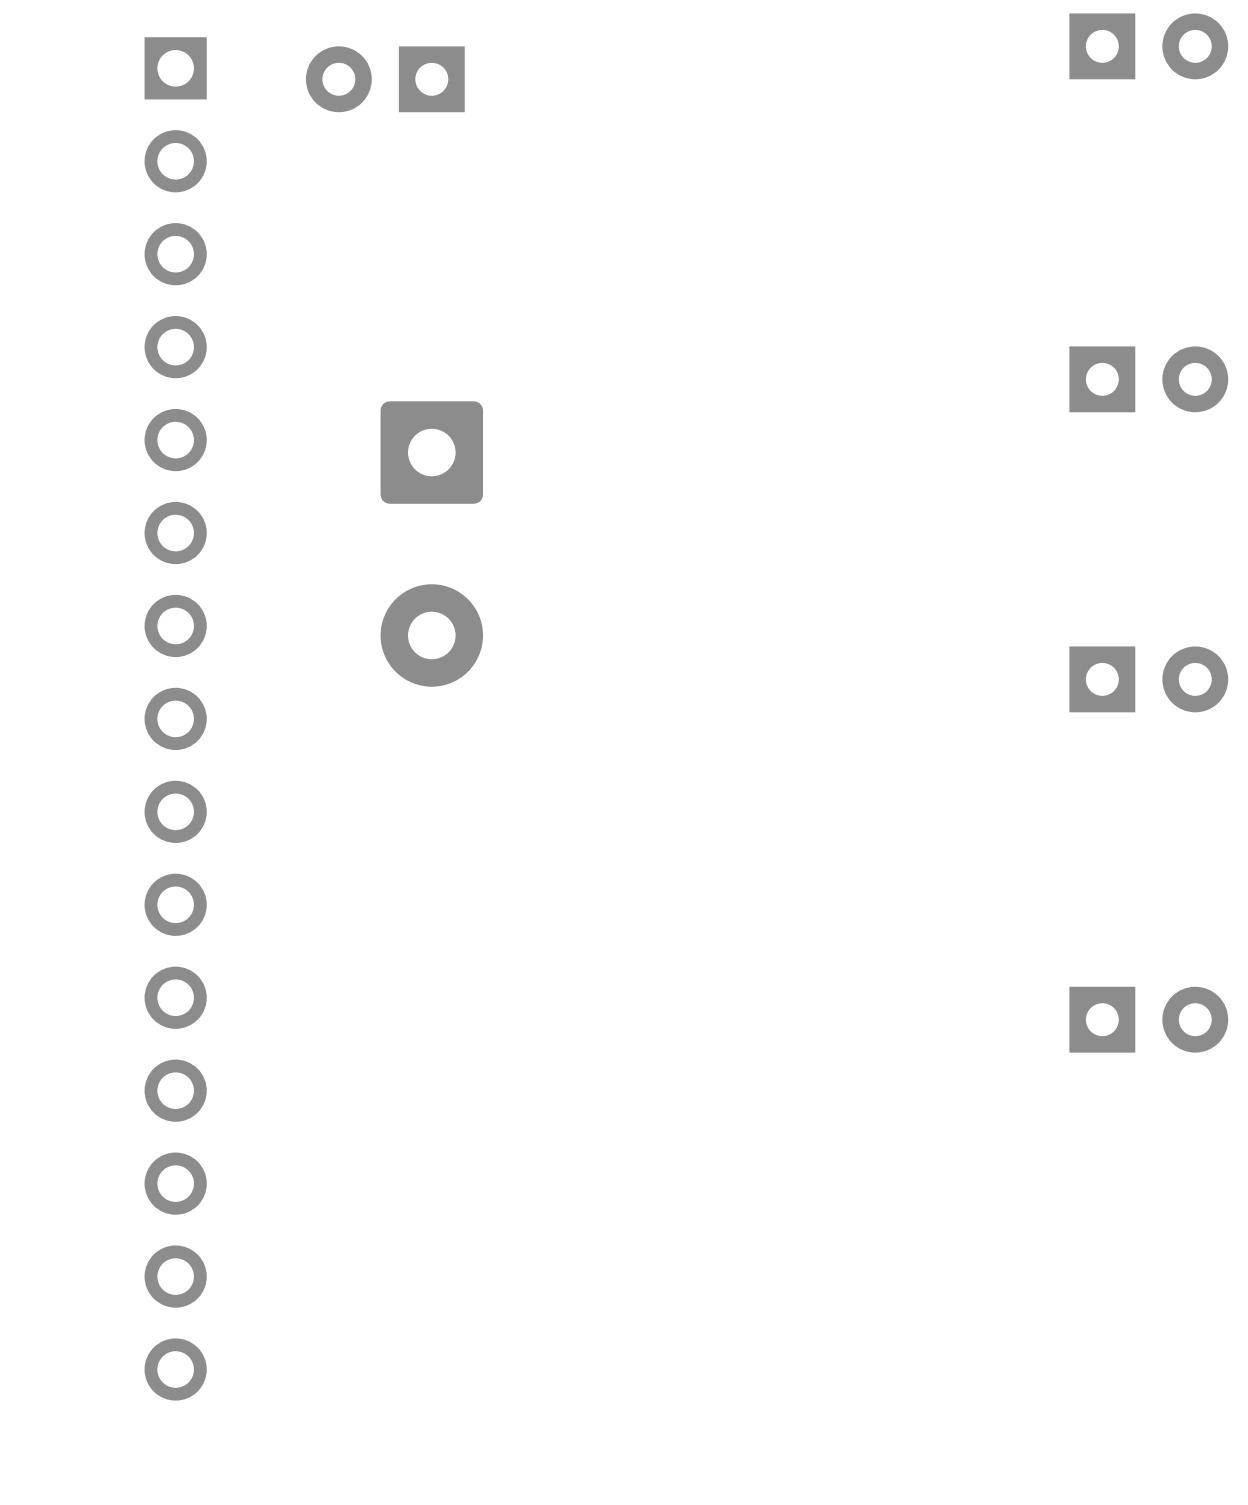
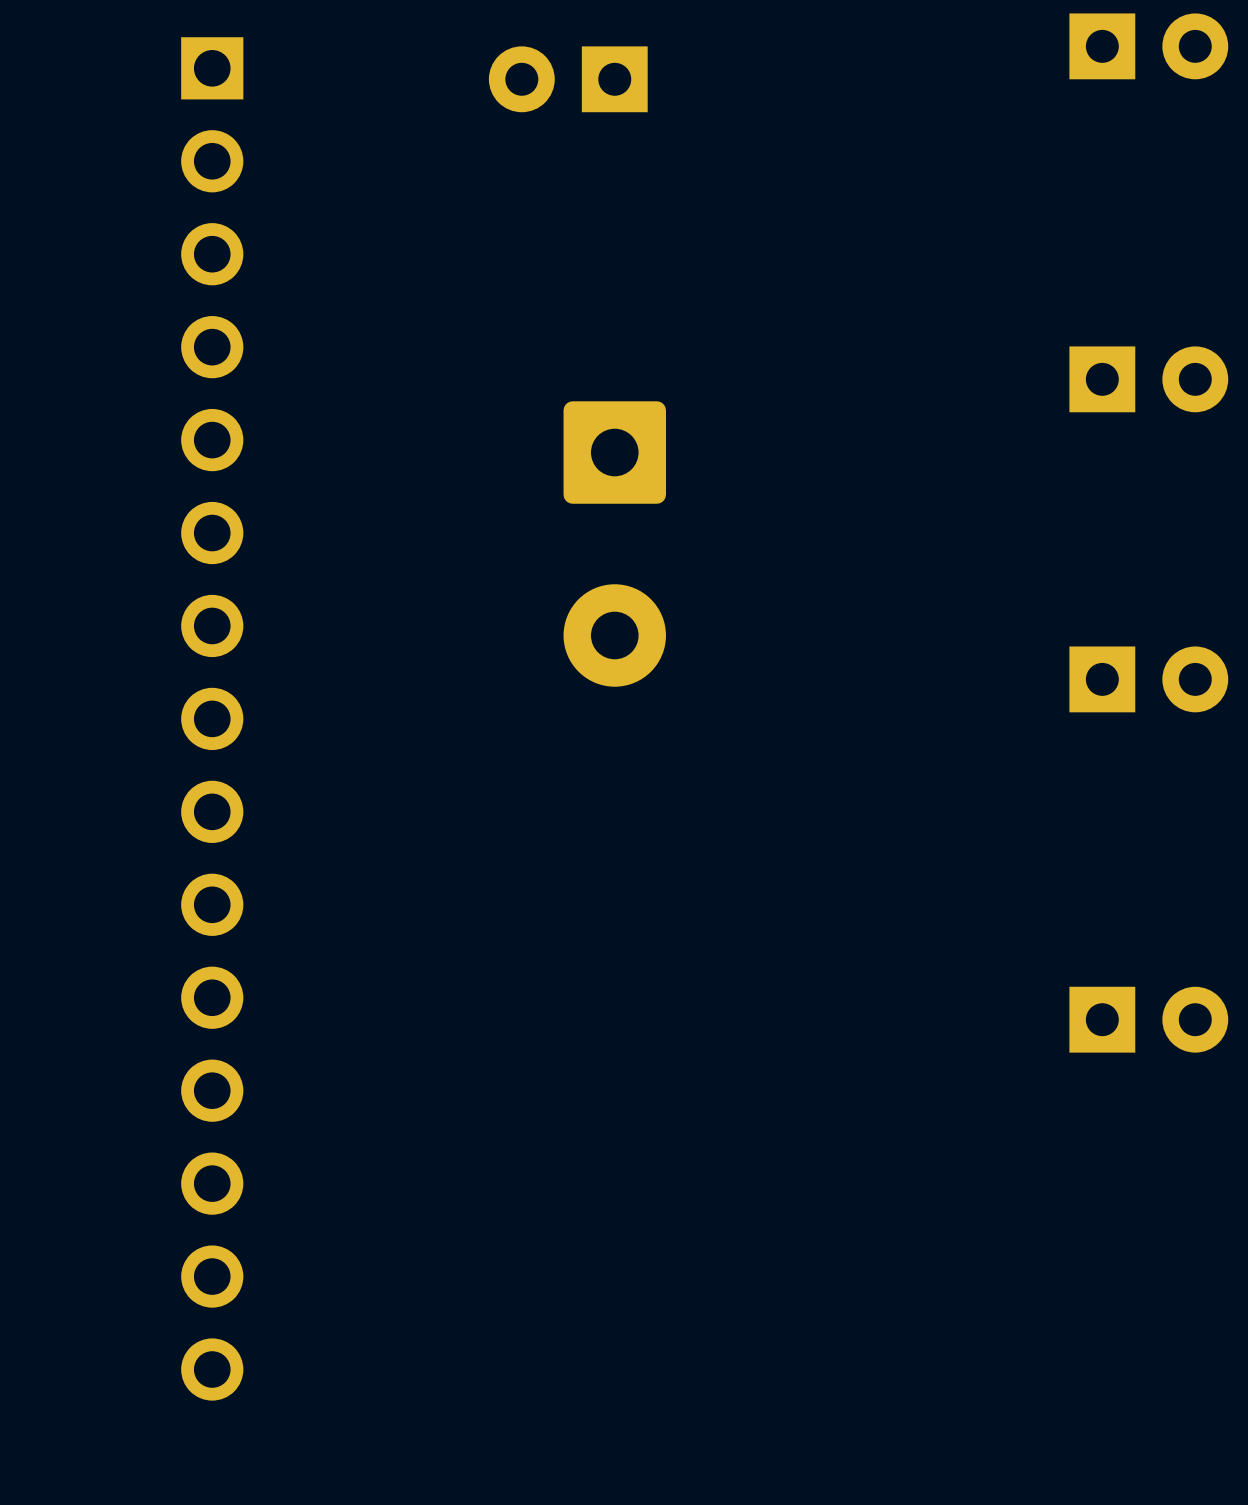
part position: (385, 79) -> (568, 79)
part position: (431, 544) -> (614, 544)
part position: (175, 718) -> (212, 718)

